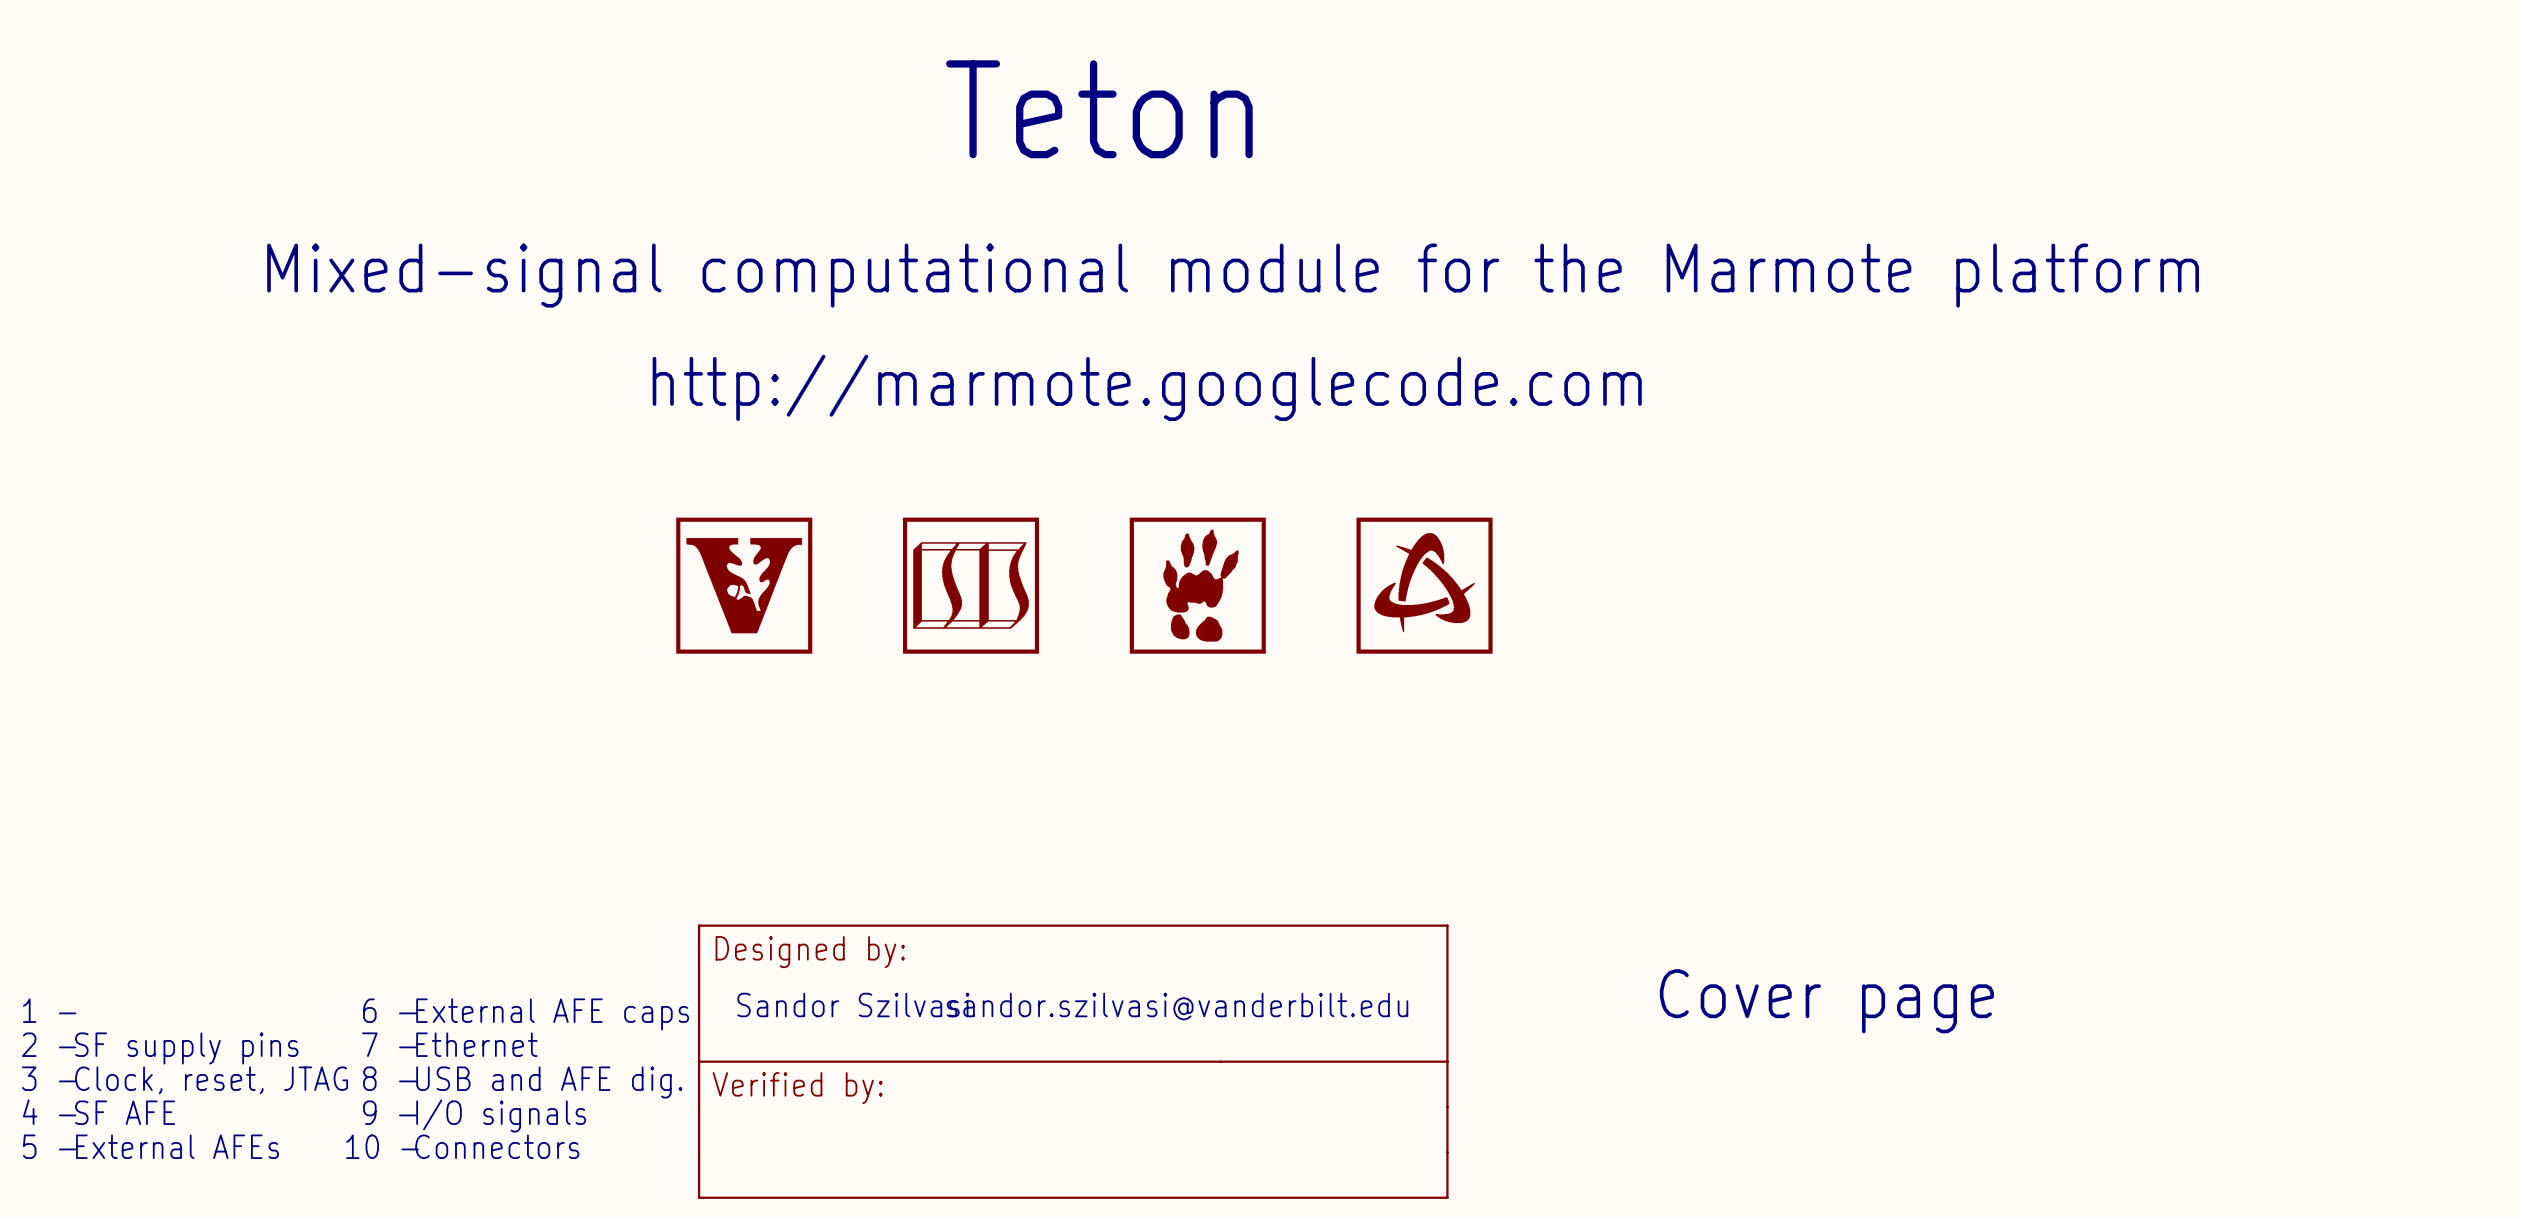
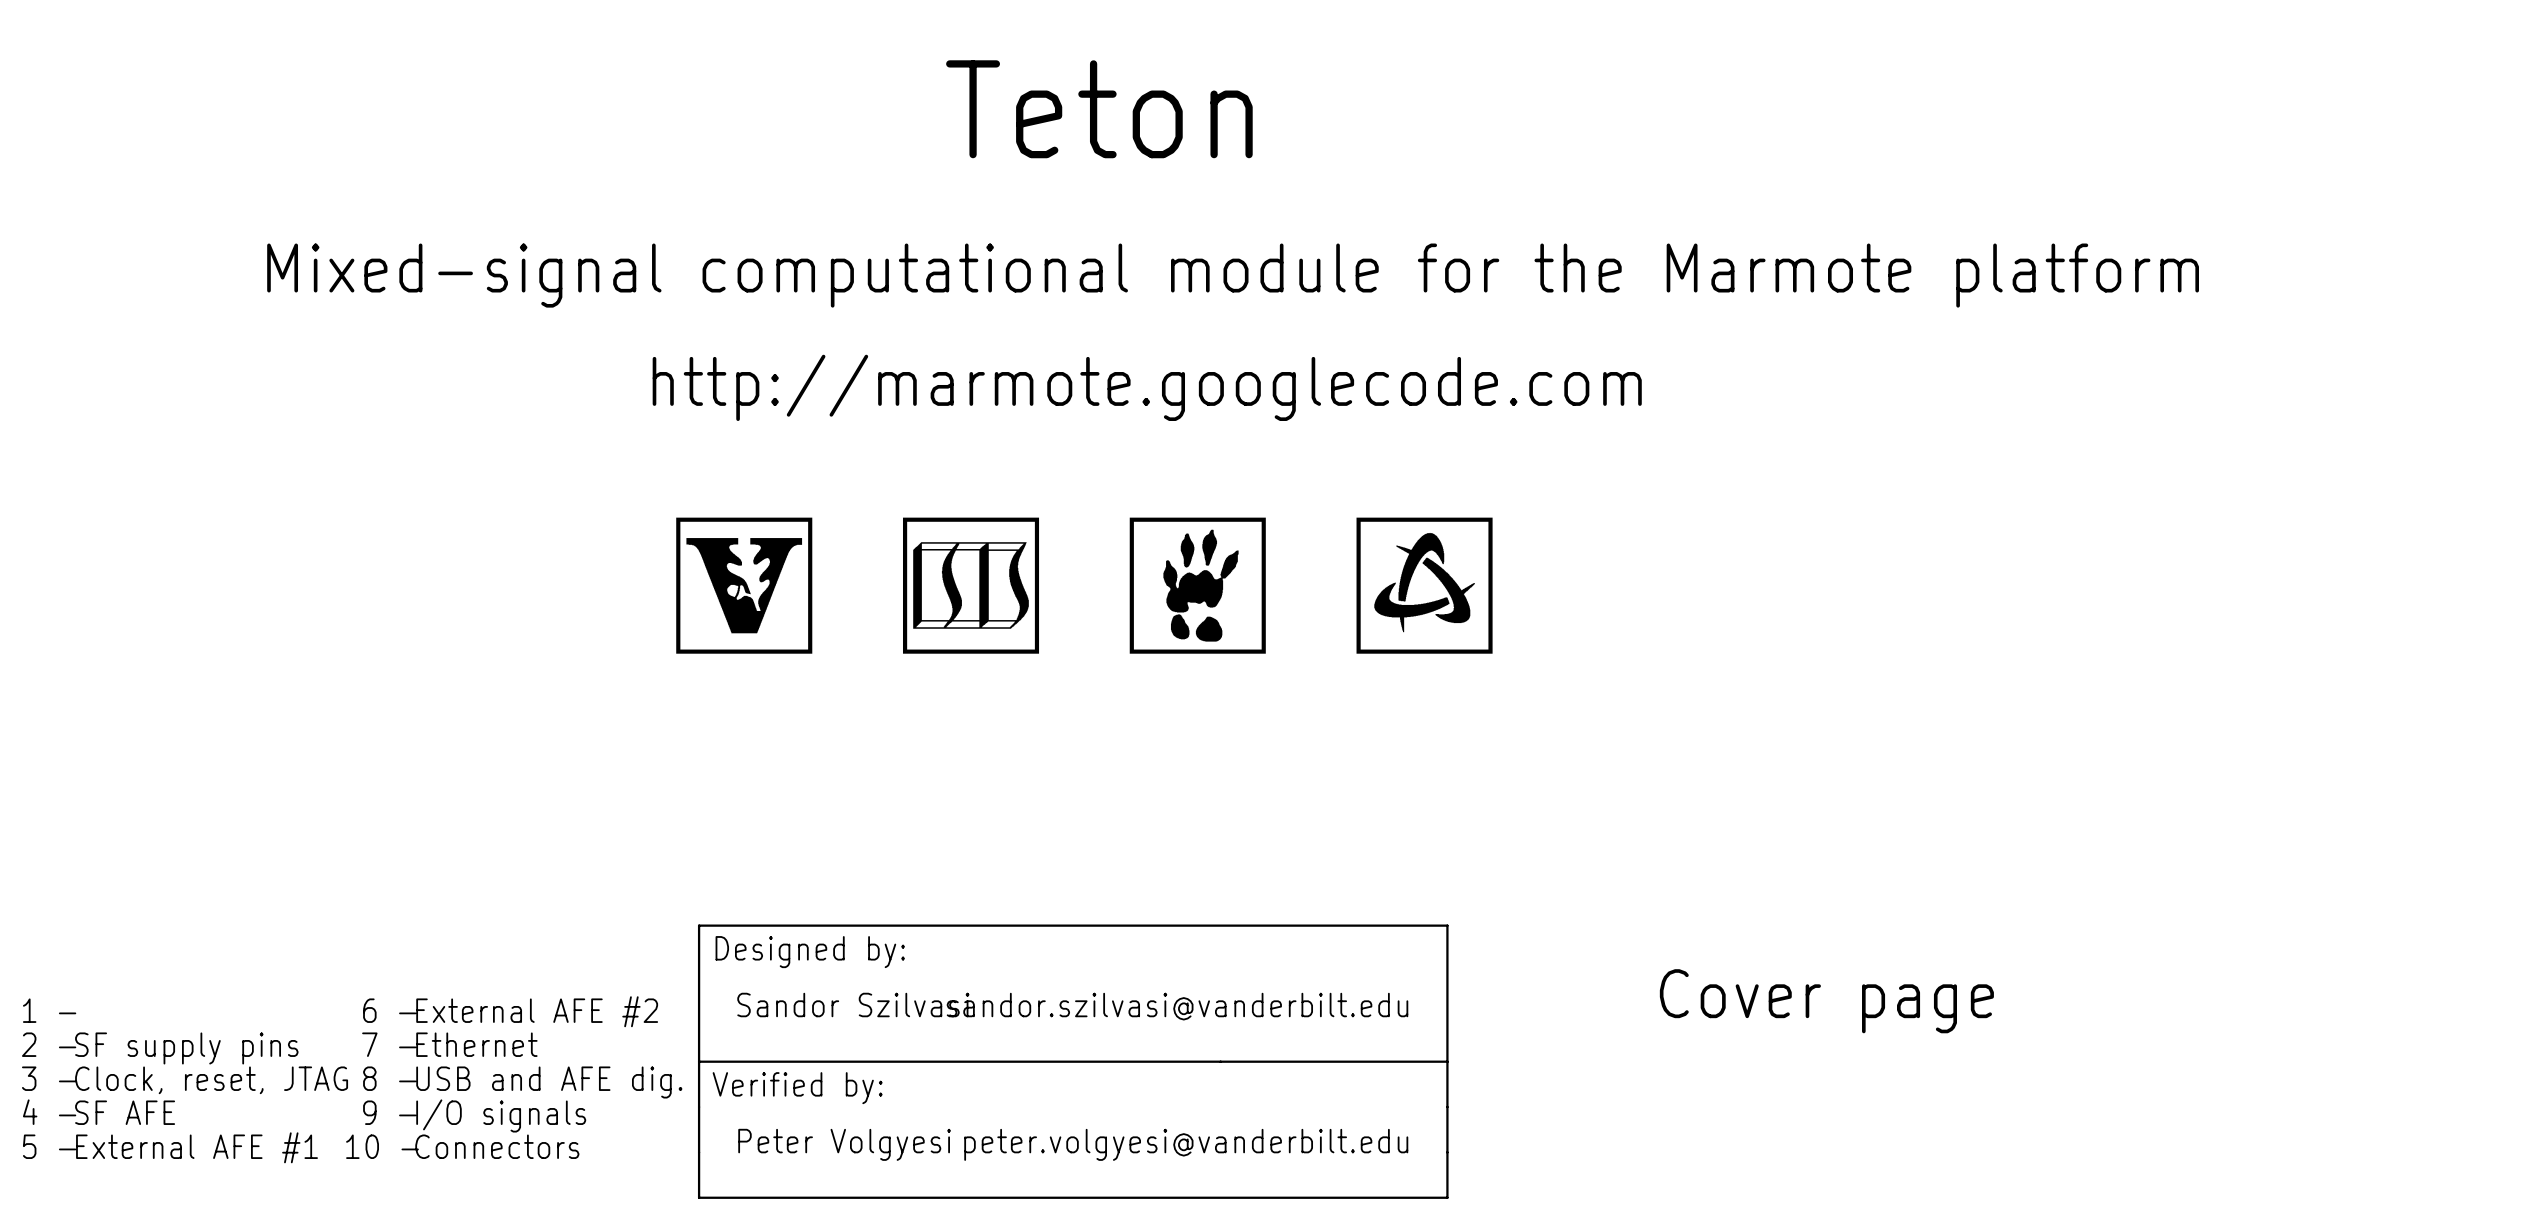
text: External AFE caps (552, 1014) -> External AFE #2 (537, 1011)
text: none -> Peter Volgyesi (844, 1144)
text: none -> peter.volgyesi@vanderbilt.edu (1186, 1144)
text: External AFEs (177, 1146) -> External AFE #1 (197, 1147)

